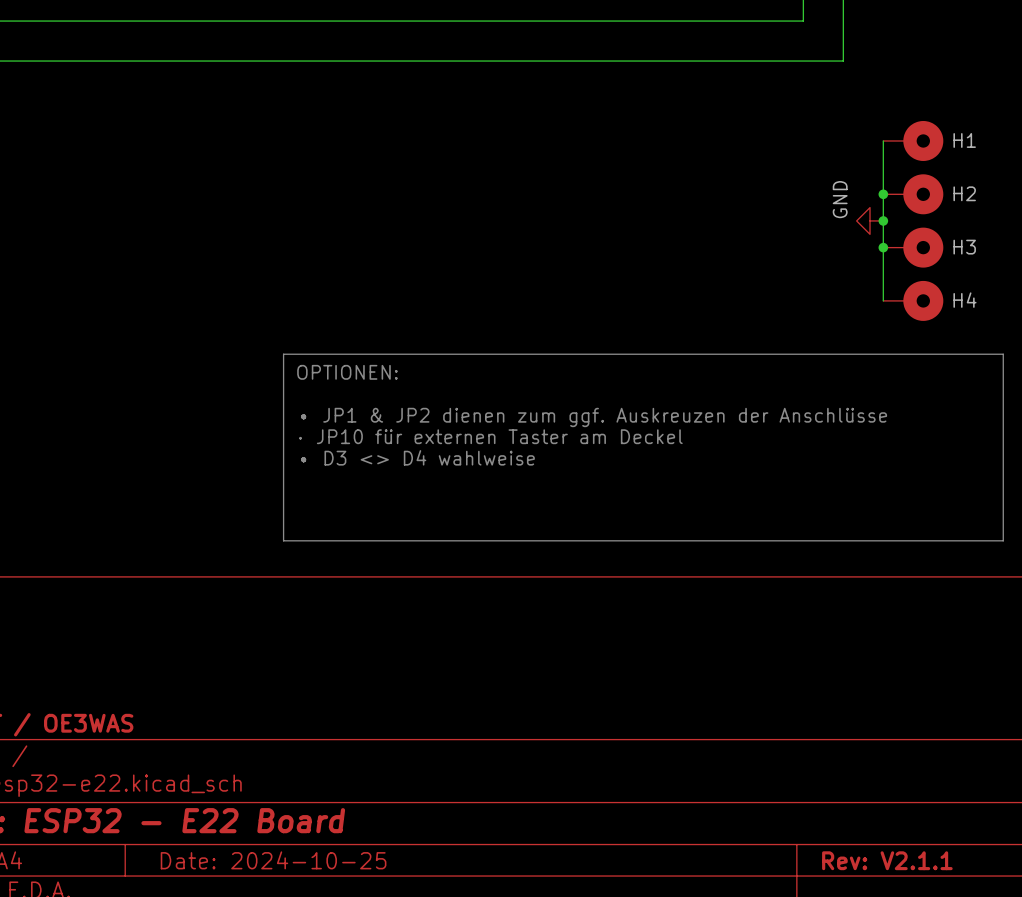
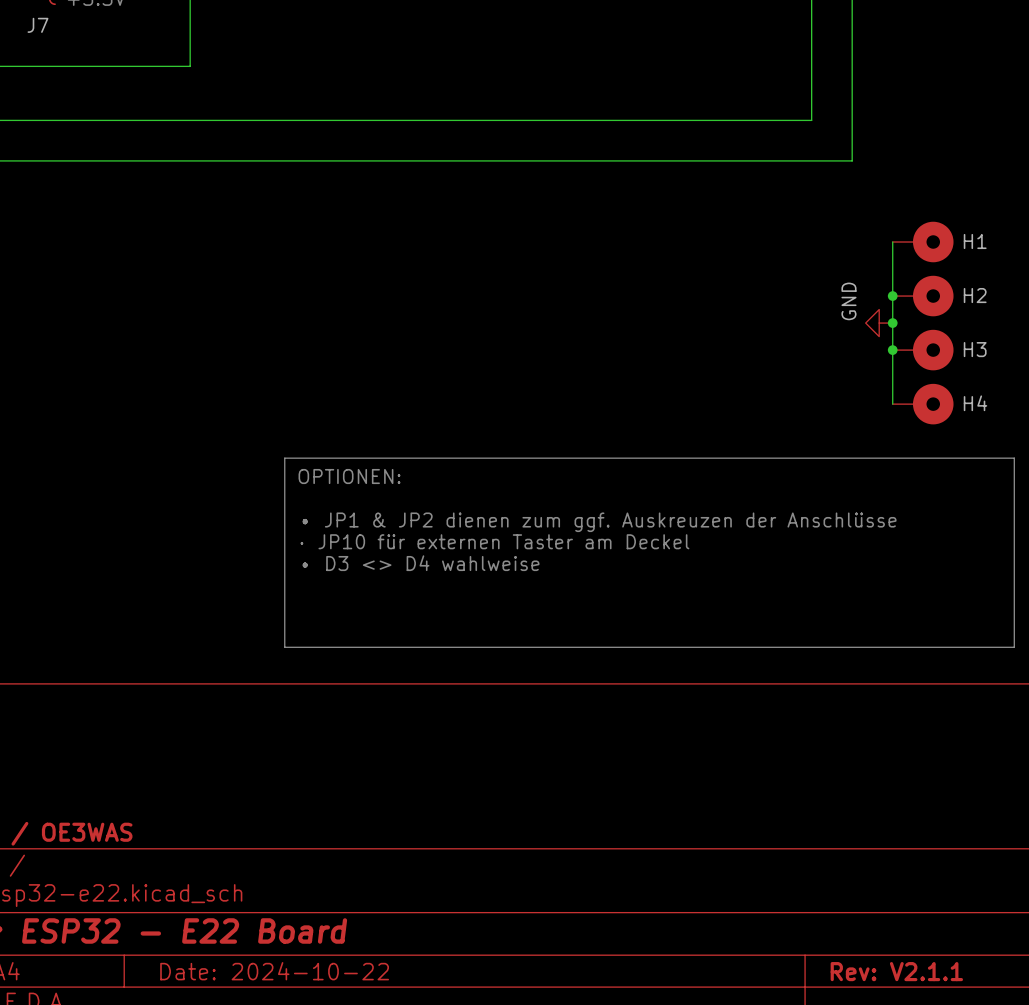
title block: Date: 2024-10-25 (273, 860) -> Date: 2024-10-22 (274, 971)

